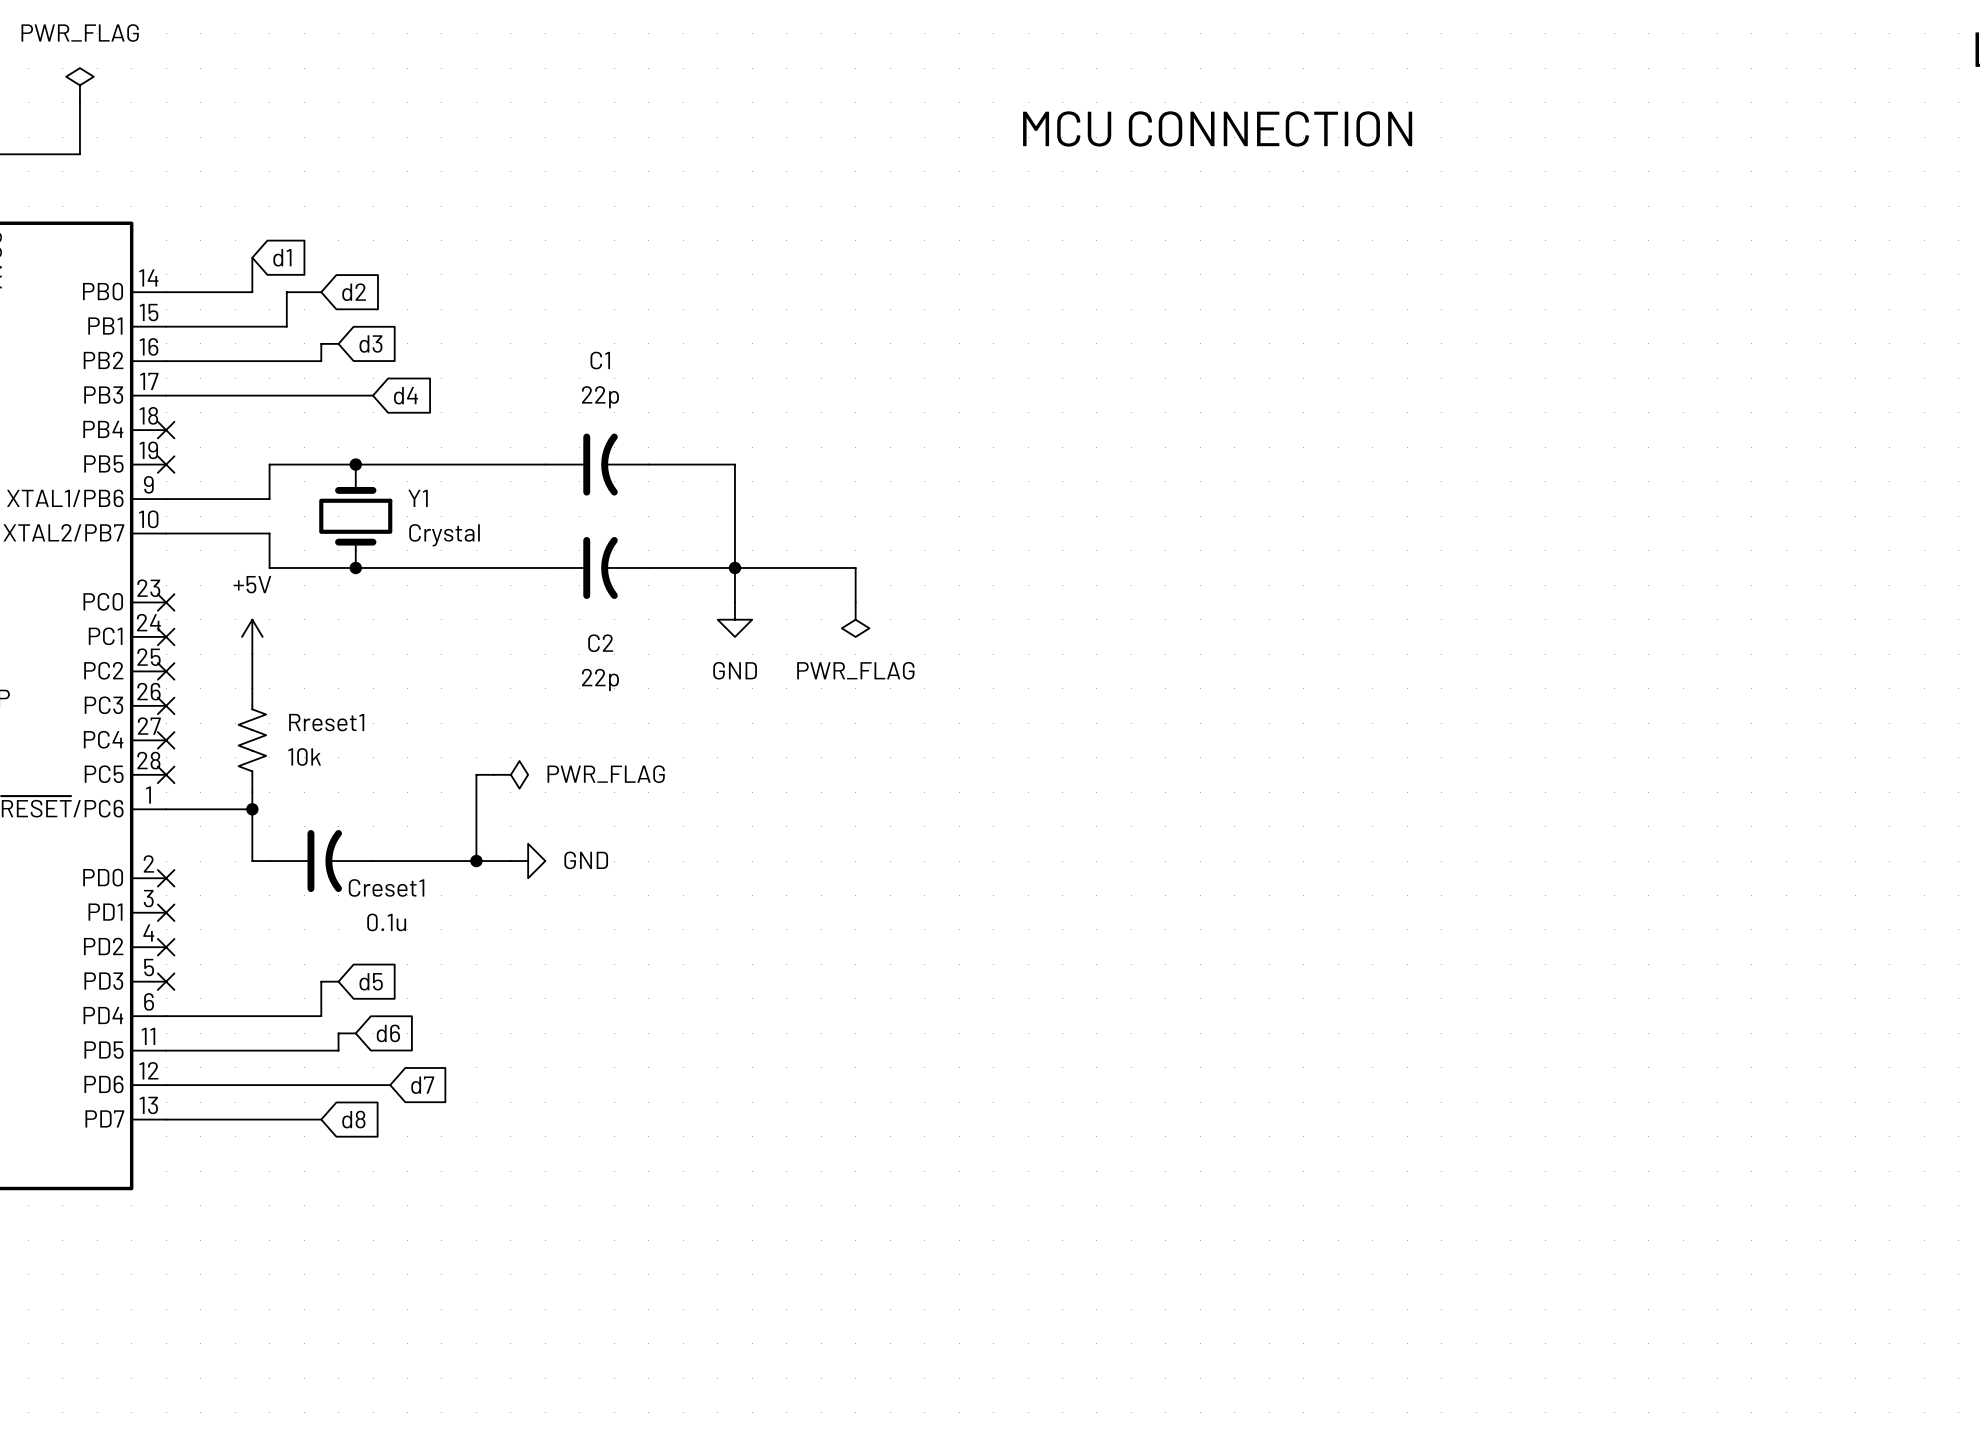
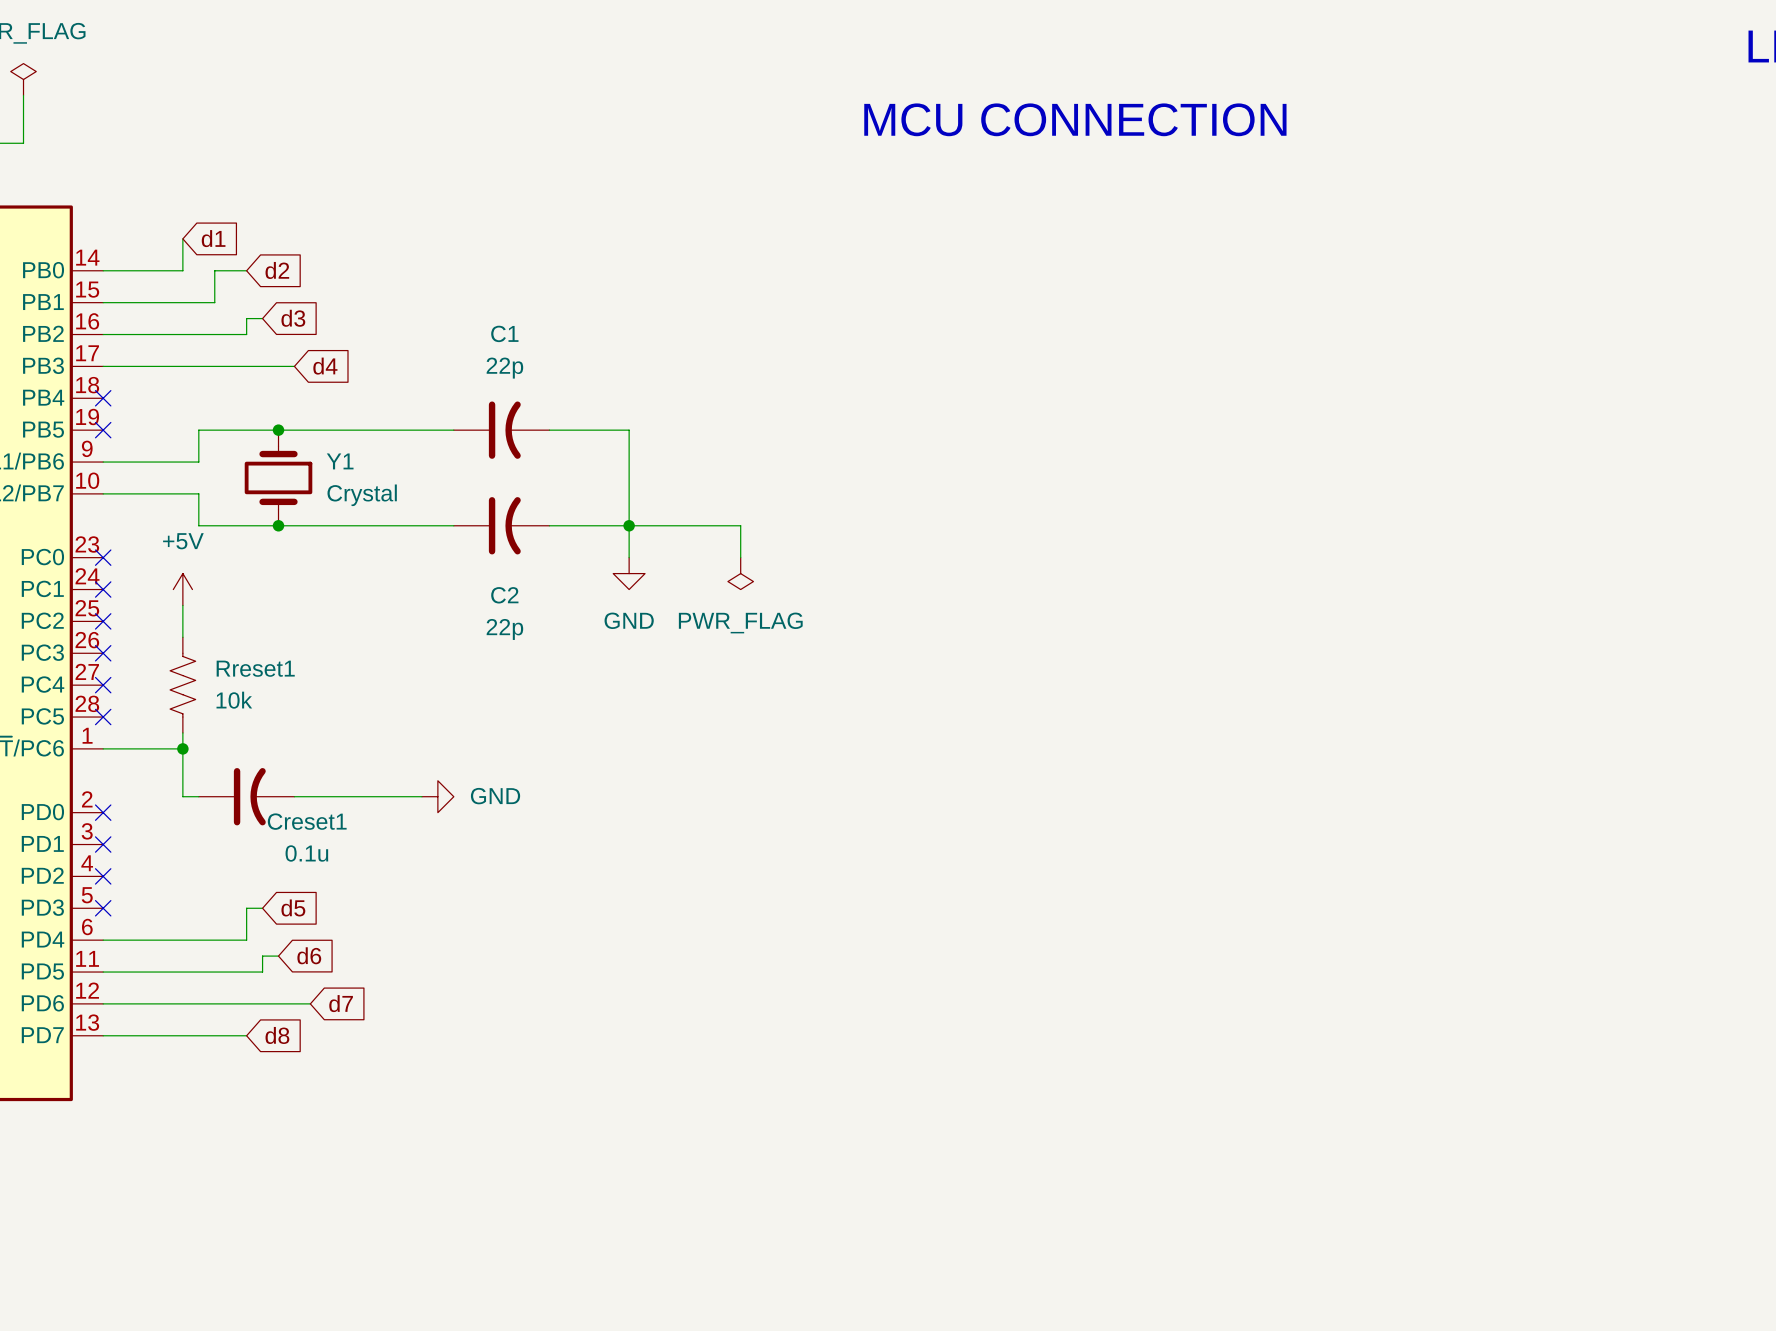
wire: (493, 774) (476, 774) (476, 861) -> none
power symbol: PWR_FLAG (510, 774) -> none
junction: (476, 861) -> none

